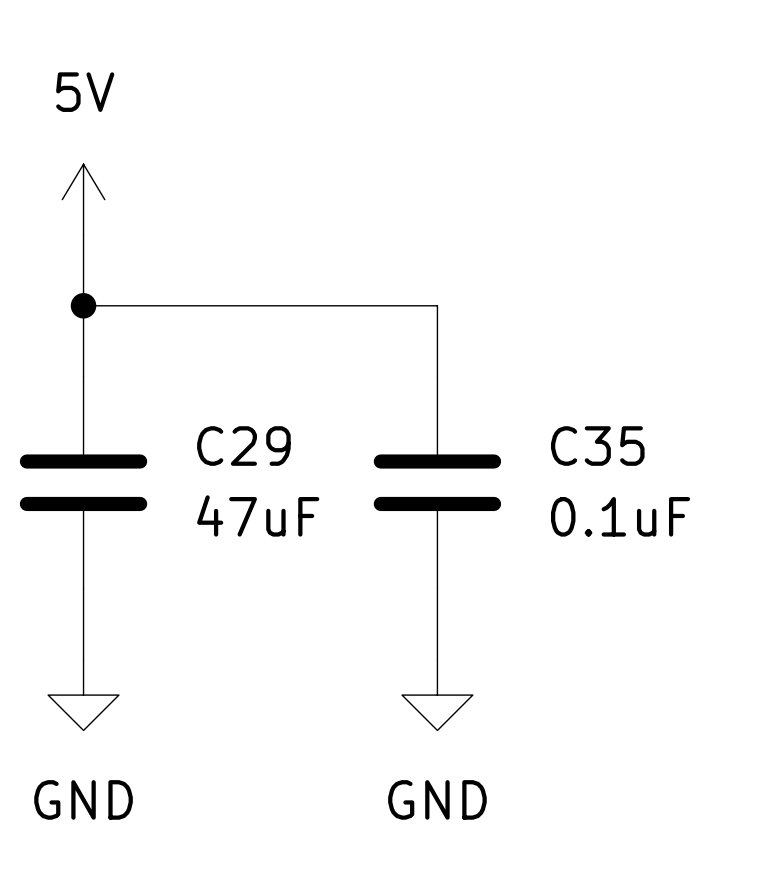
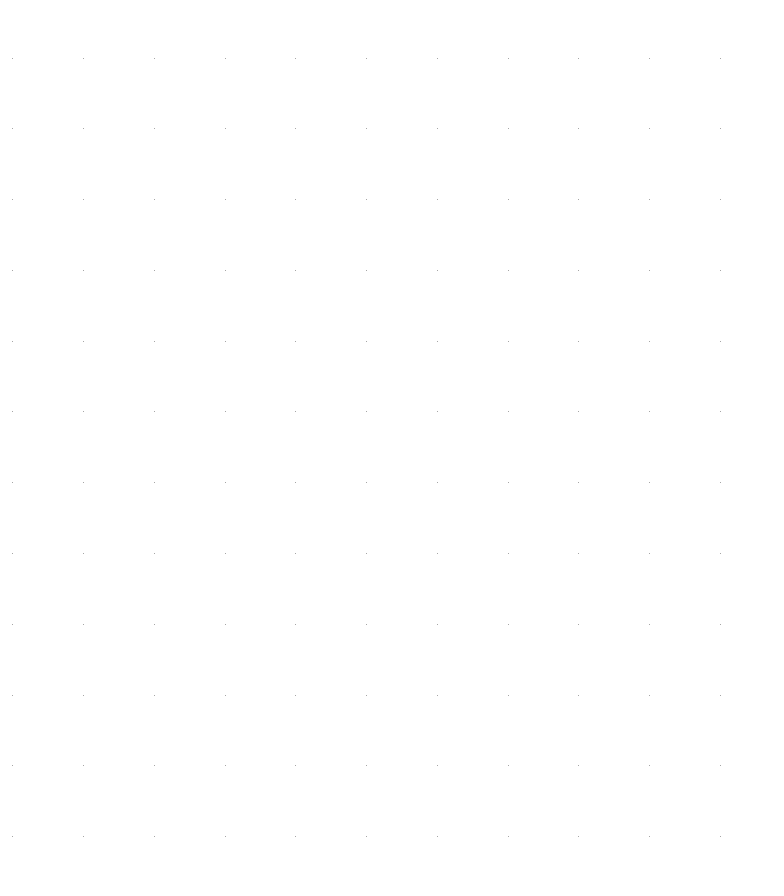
power symbol: 5V (83, 199) -> none
wire: (83, 235) (83, 376) -> none
wire: (83, 305) (437, 305) (437, 376) -> none
junction: (83, 305) -> none
C29: 47uF (83, 482) -> none
C35: 0.1uF (437, 482) -> none
wire: (83, 588) (83, 659) -> none
wire: (437, 588) (437, 659) -> none
power symbol: GND (83, 695) -> none
power symbol: GND (437, 695) -> none

